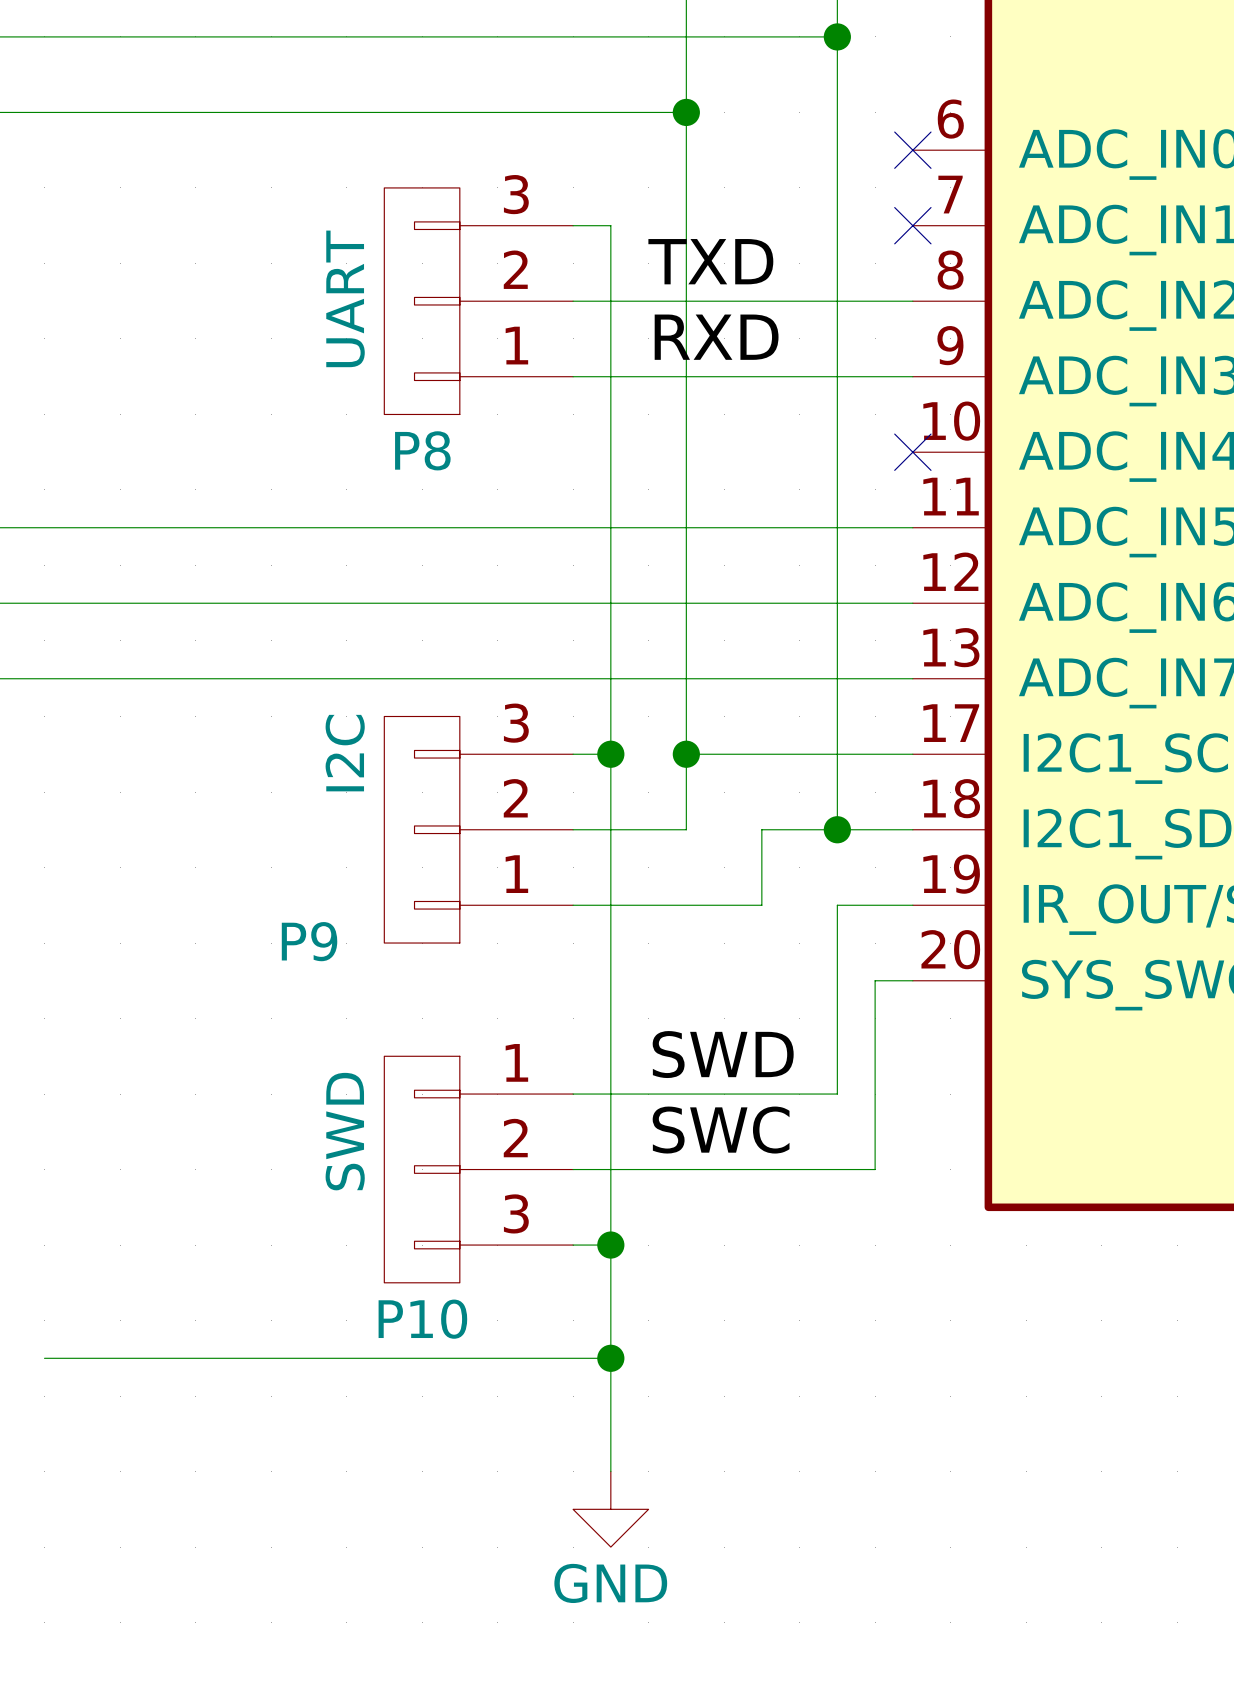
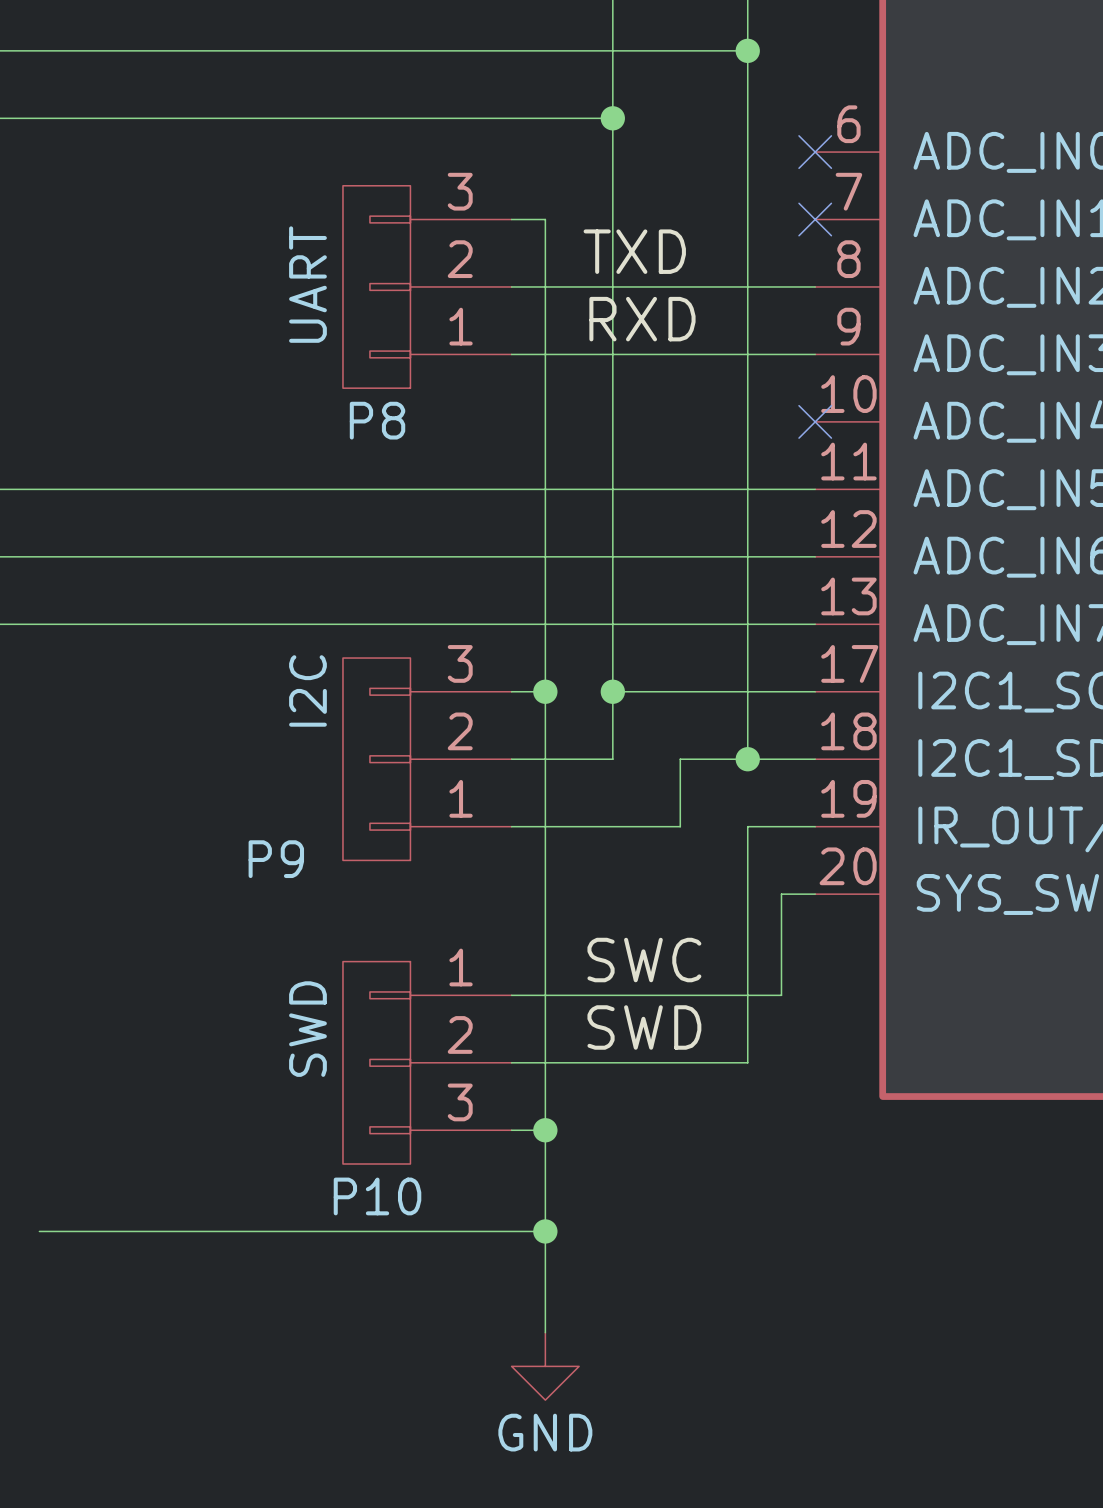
label: SWD (723, 1054) -> SWC (644, 960)
wire: (875, 1094) (875, 1169) (837, 1169) -> (781, 995) (747, 995) (747, 1062)
label: SWC (721, 1130) -> SWD (644, 1027)

